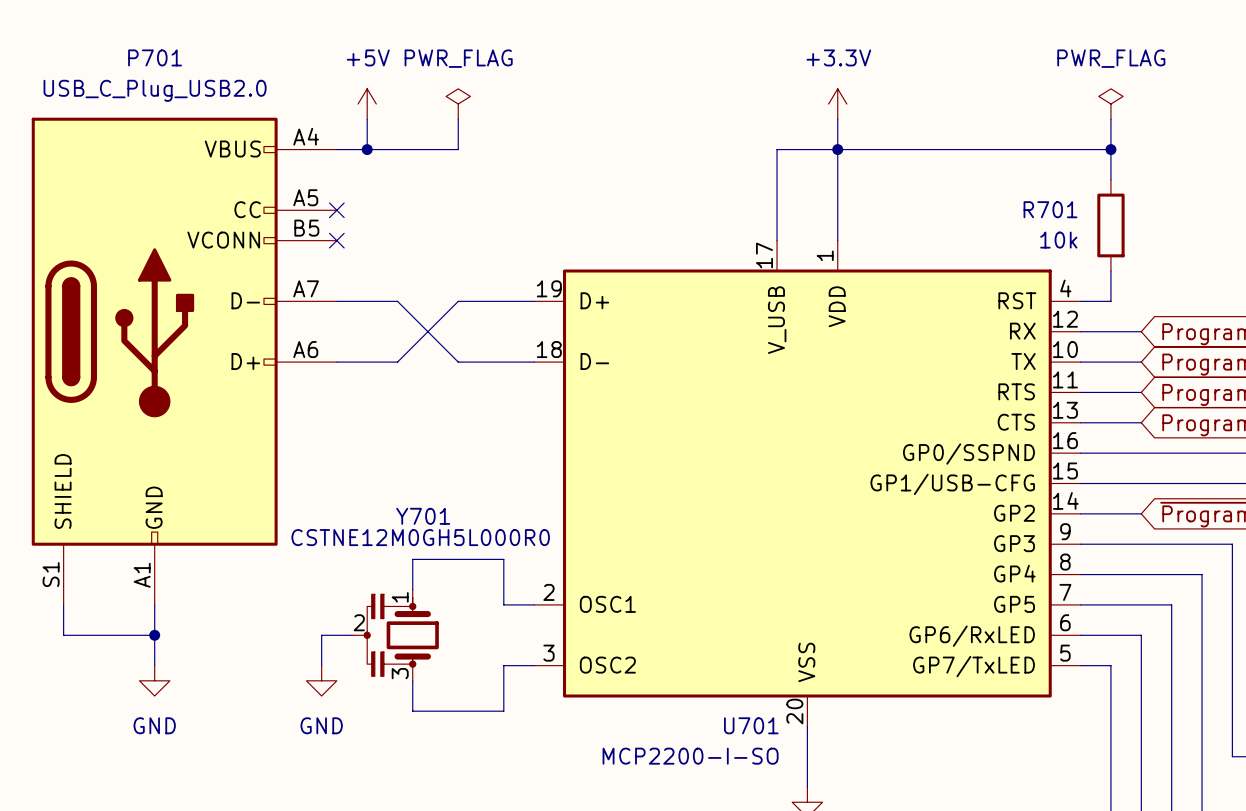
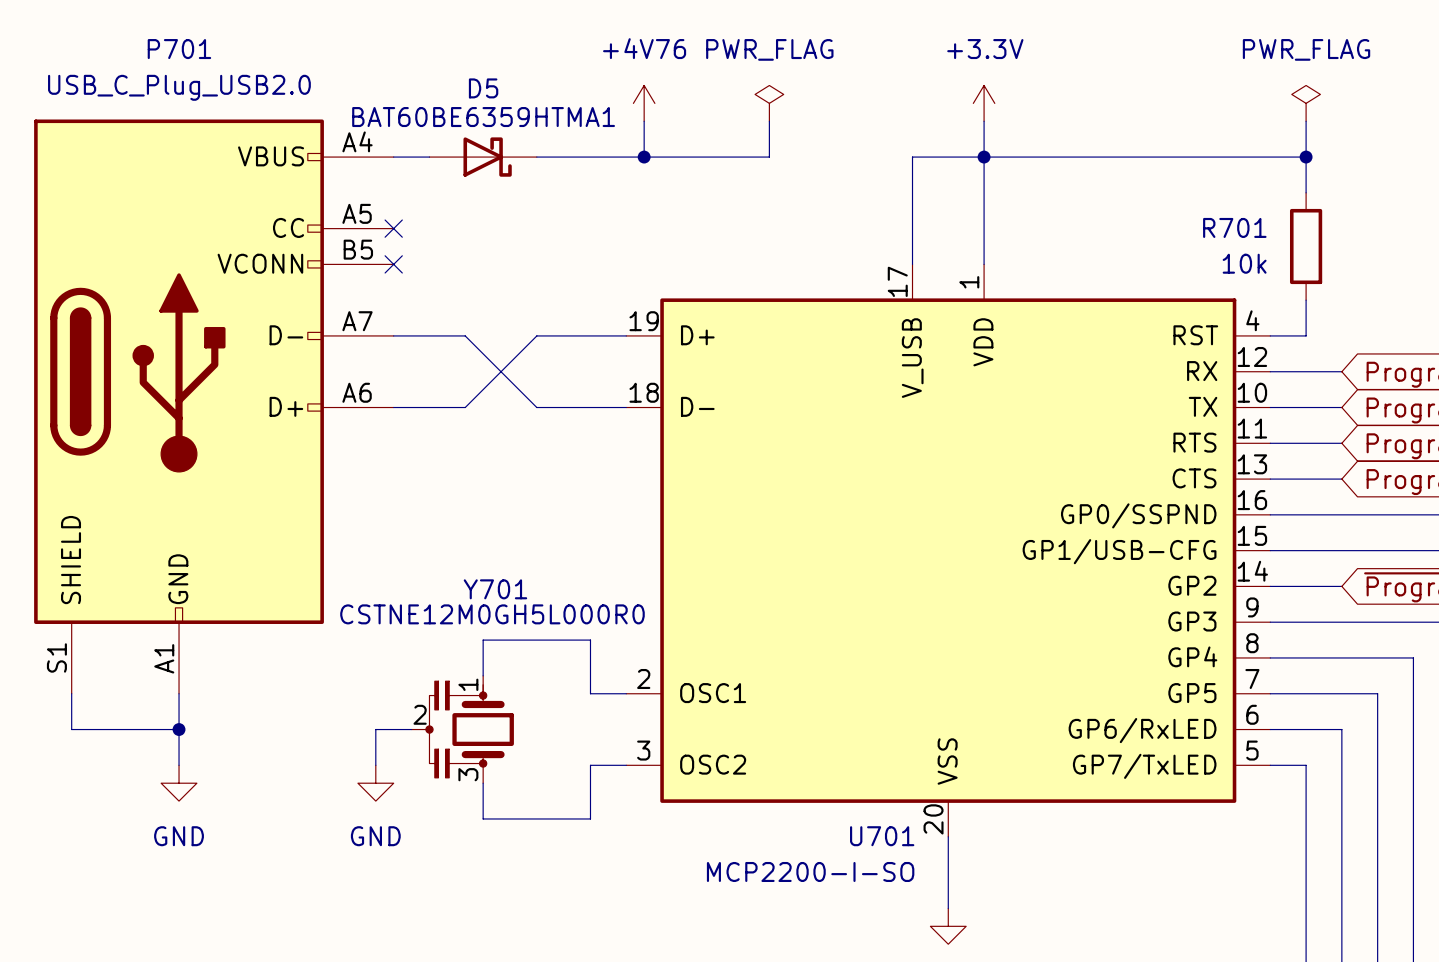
power symbol: +5V (367, 104) -> none
power symbol position: PWR_FLAG (458, 104) -> PWR_FLAG (769, 103)
power symbol: none -> +4V76 (644, 103)
wire: (367, 119) (367, 149) (458, 149) (458, 119) -> none
wire: none -> (644, 121) (644, 157)
wire: none -> (769, 121) (769, 157) (536, 157)
junction: (367, 149) -> none
D5: none -> BAT60BE6359HTMA1 (483, 157)
junction: none -> (644, 157)

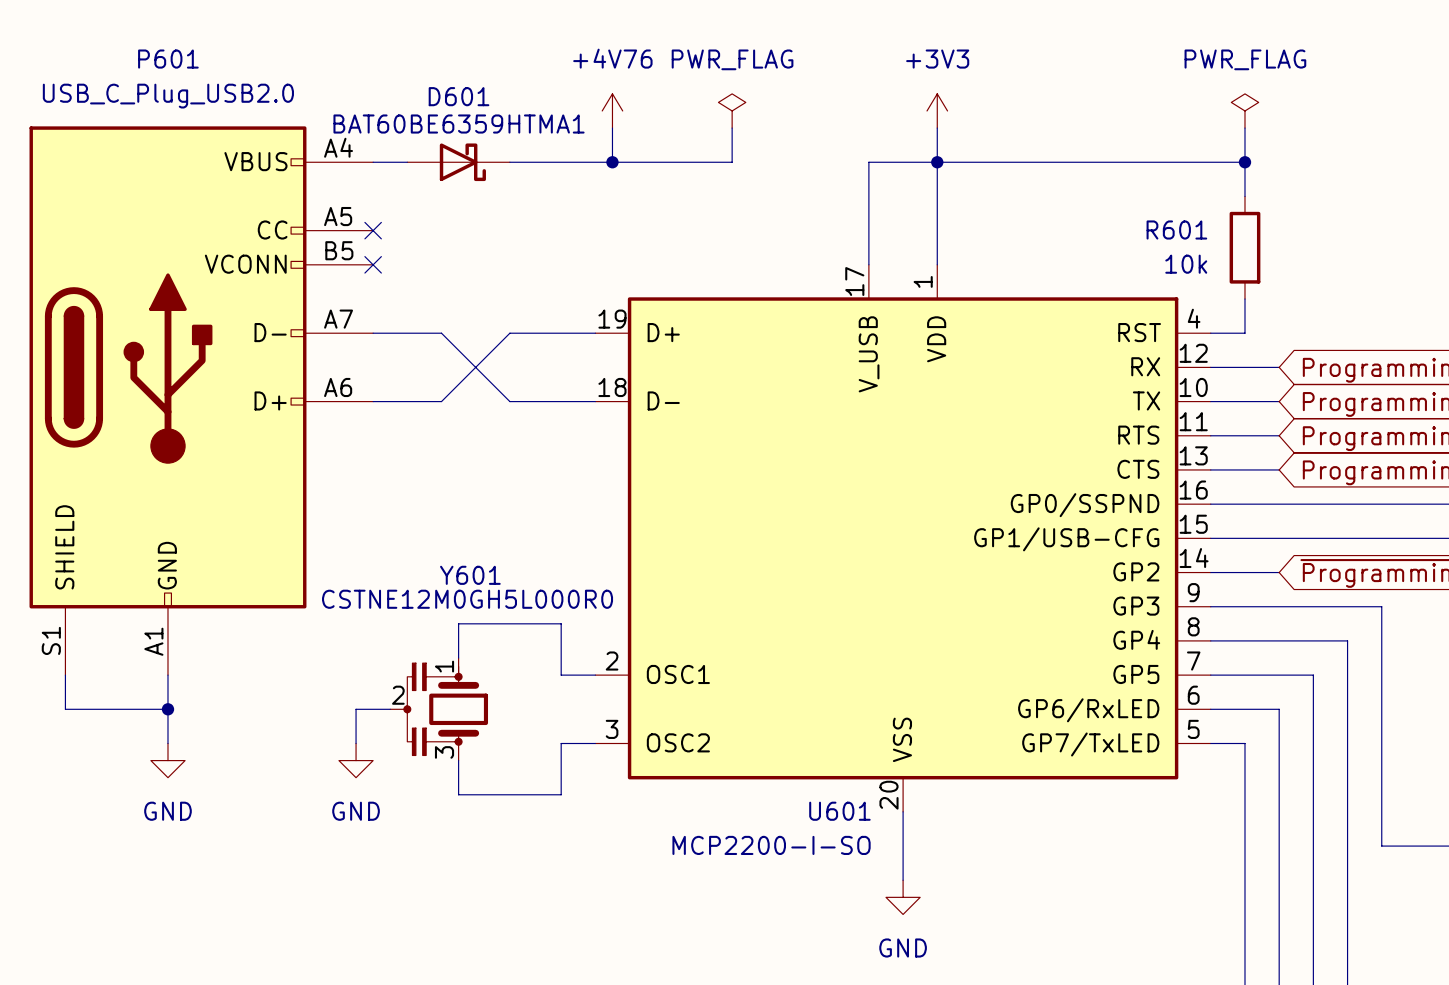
P701 name: P701 (179, 49) -> P601 (168, 59)
D5 name: D5 (483, 88) -> D601 (459, 96)
power symbol: +3.3V (984, 103) -> +3V3 (937, 110)
R701 name: R701 (1234, 227) -> R601 (1176, 230)
Y701 name: Y701 (495, 589) -> Y601 (470, 575)
U701 name: U701 (882, 836) -> U601 (839, 811)

